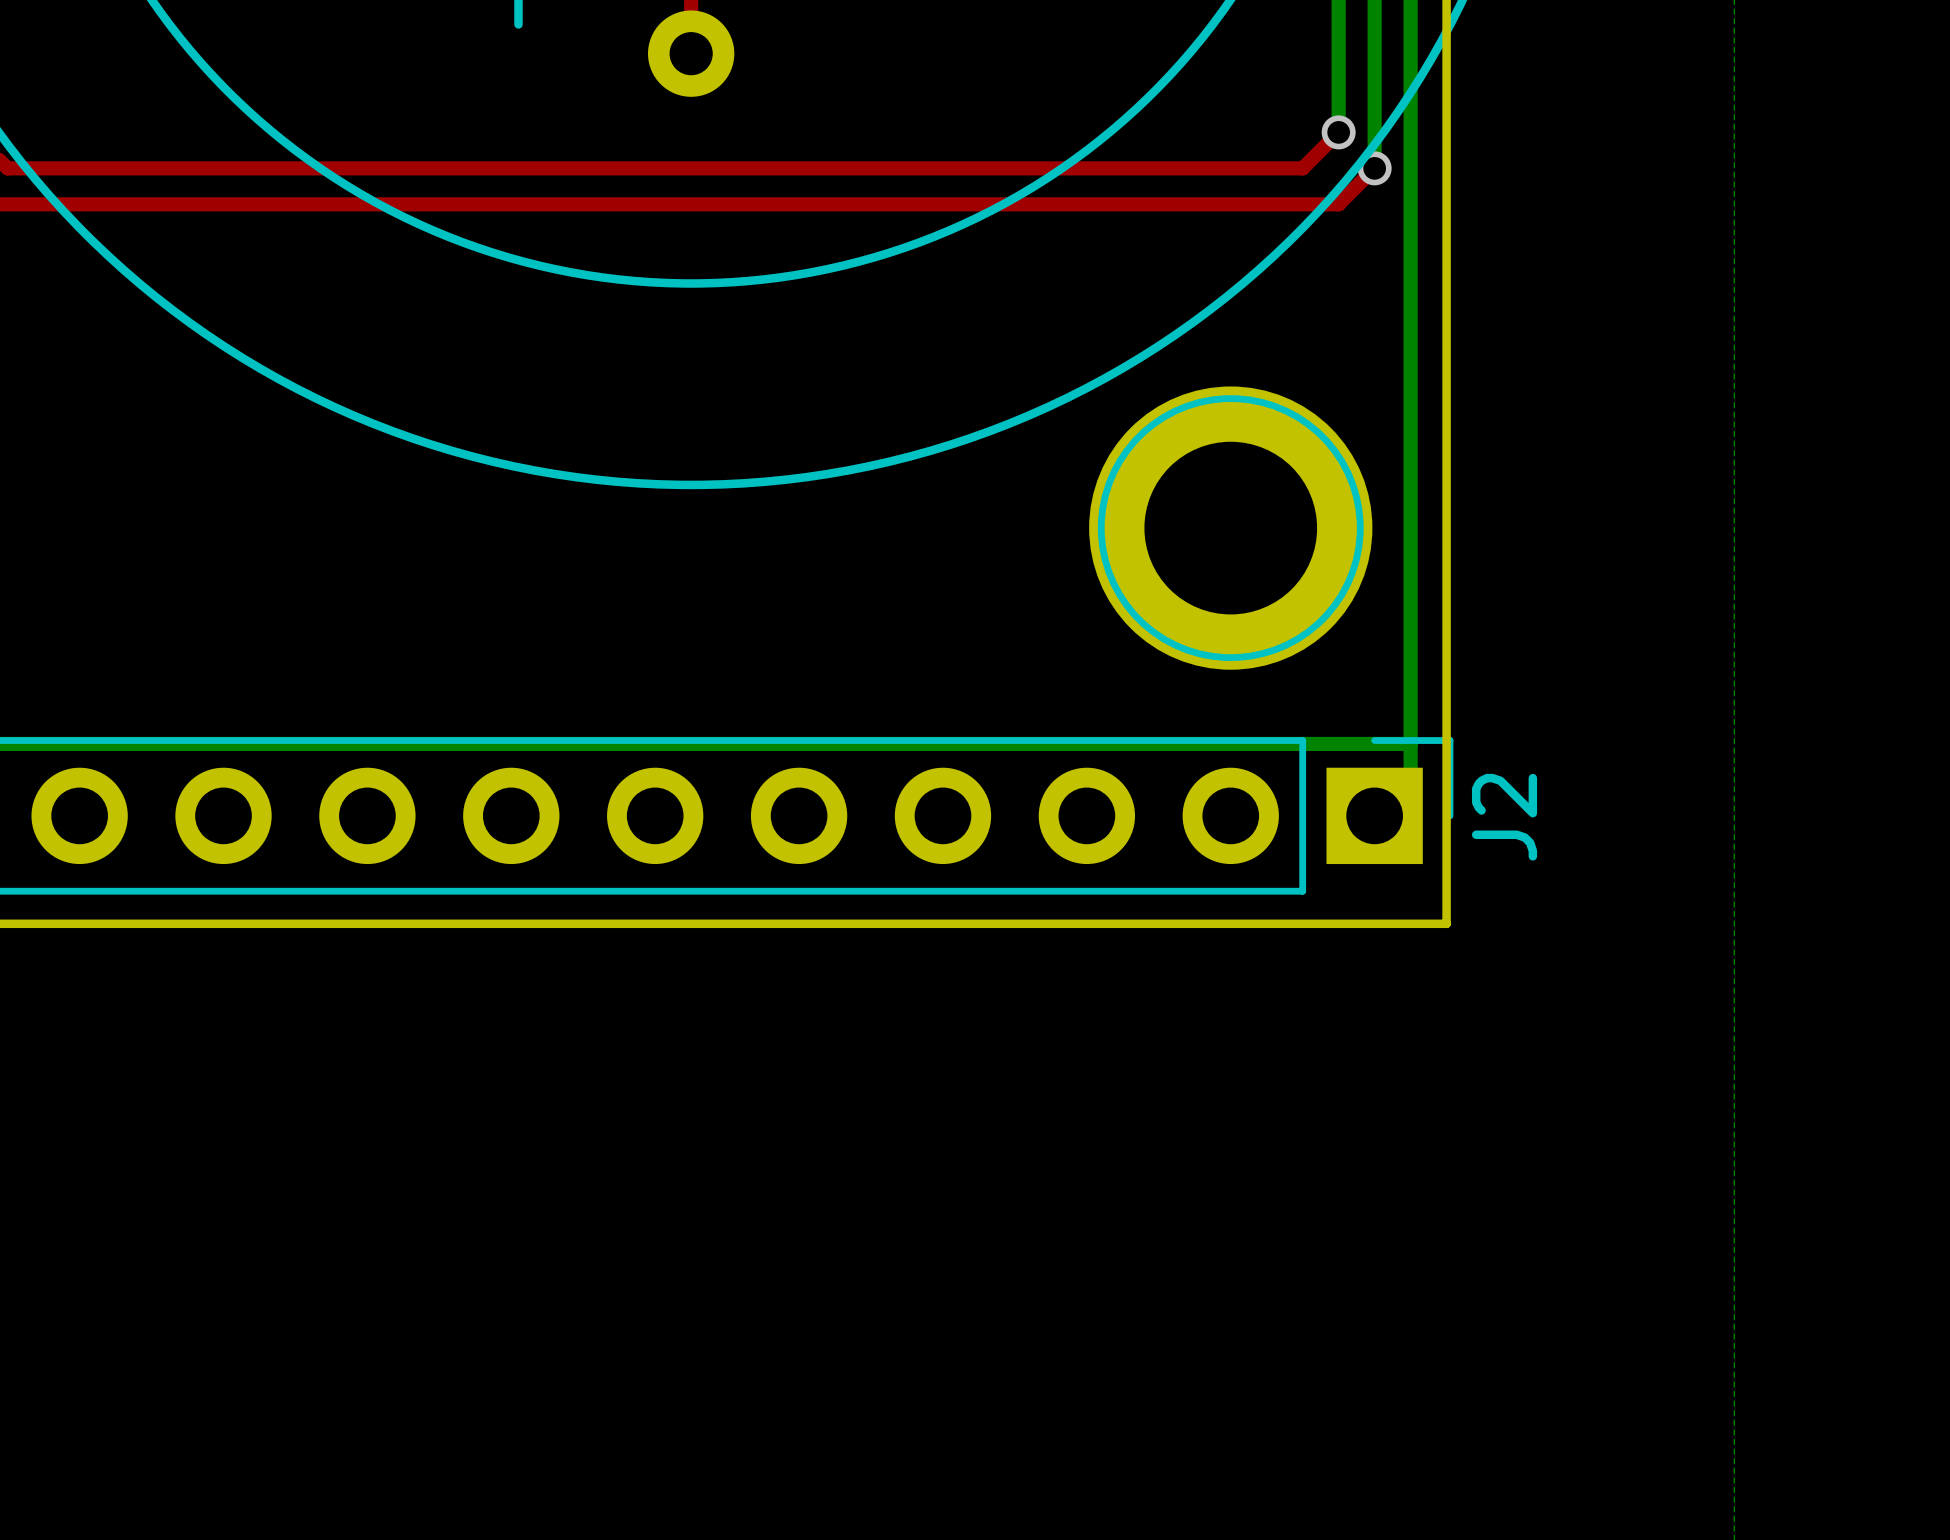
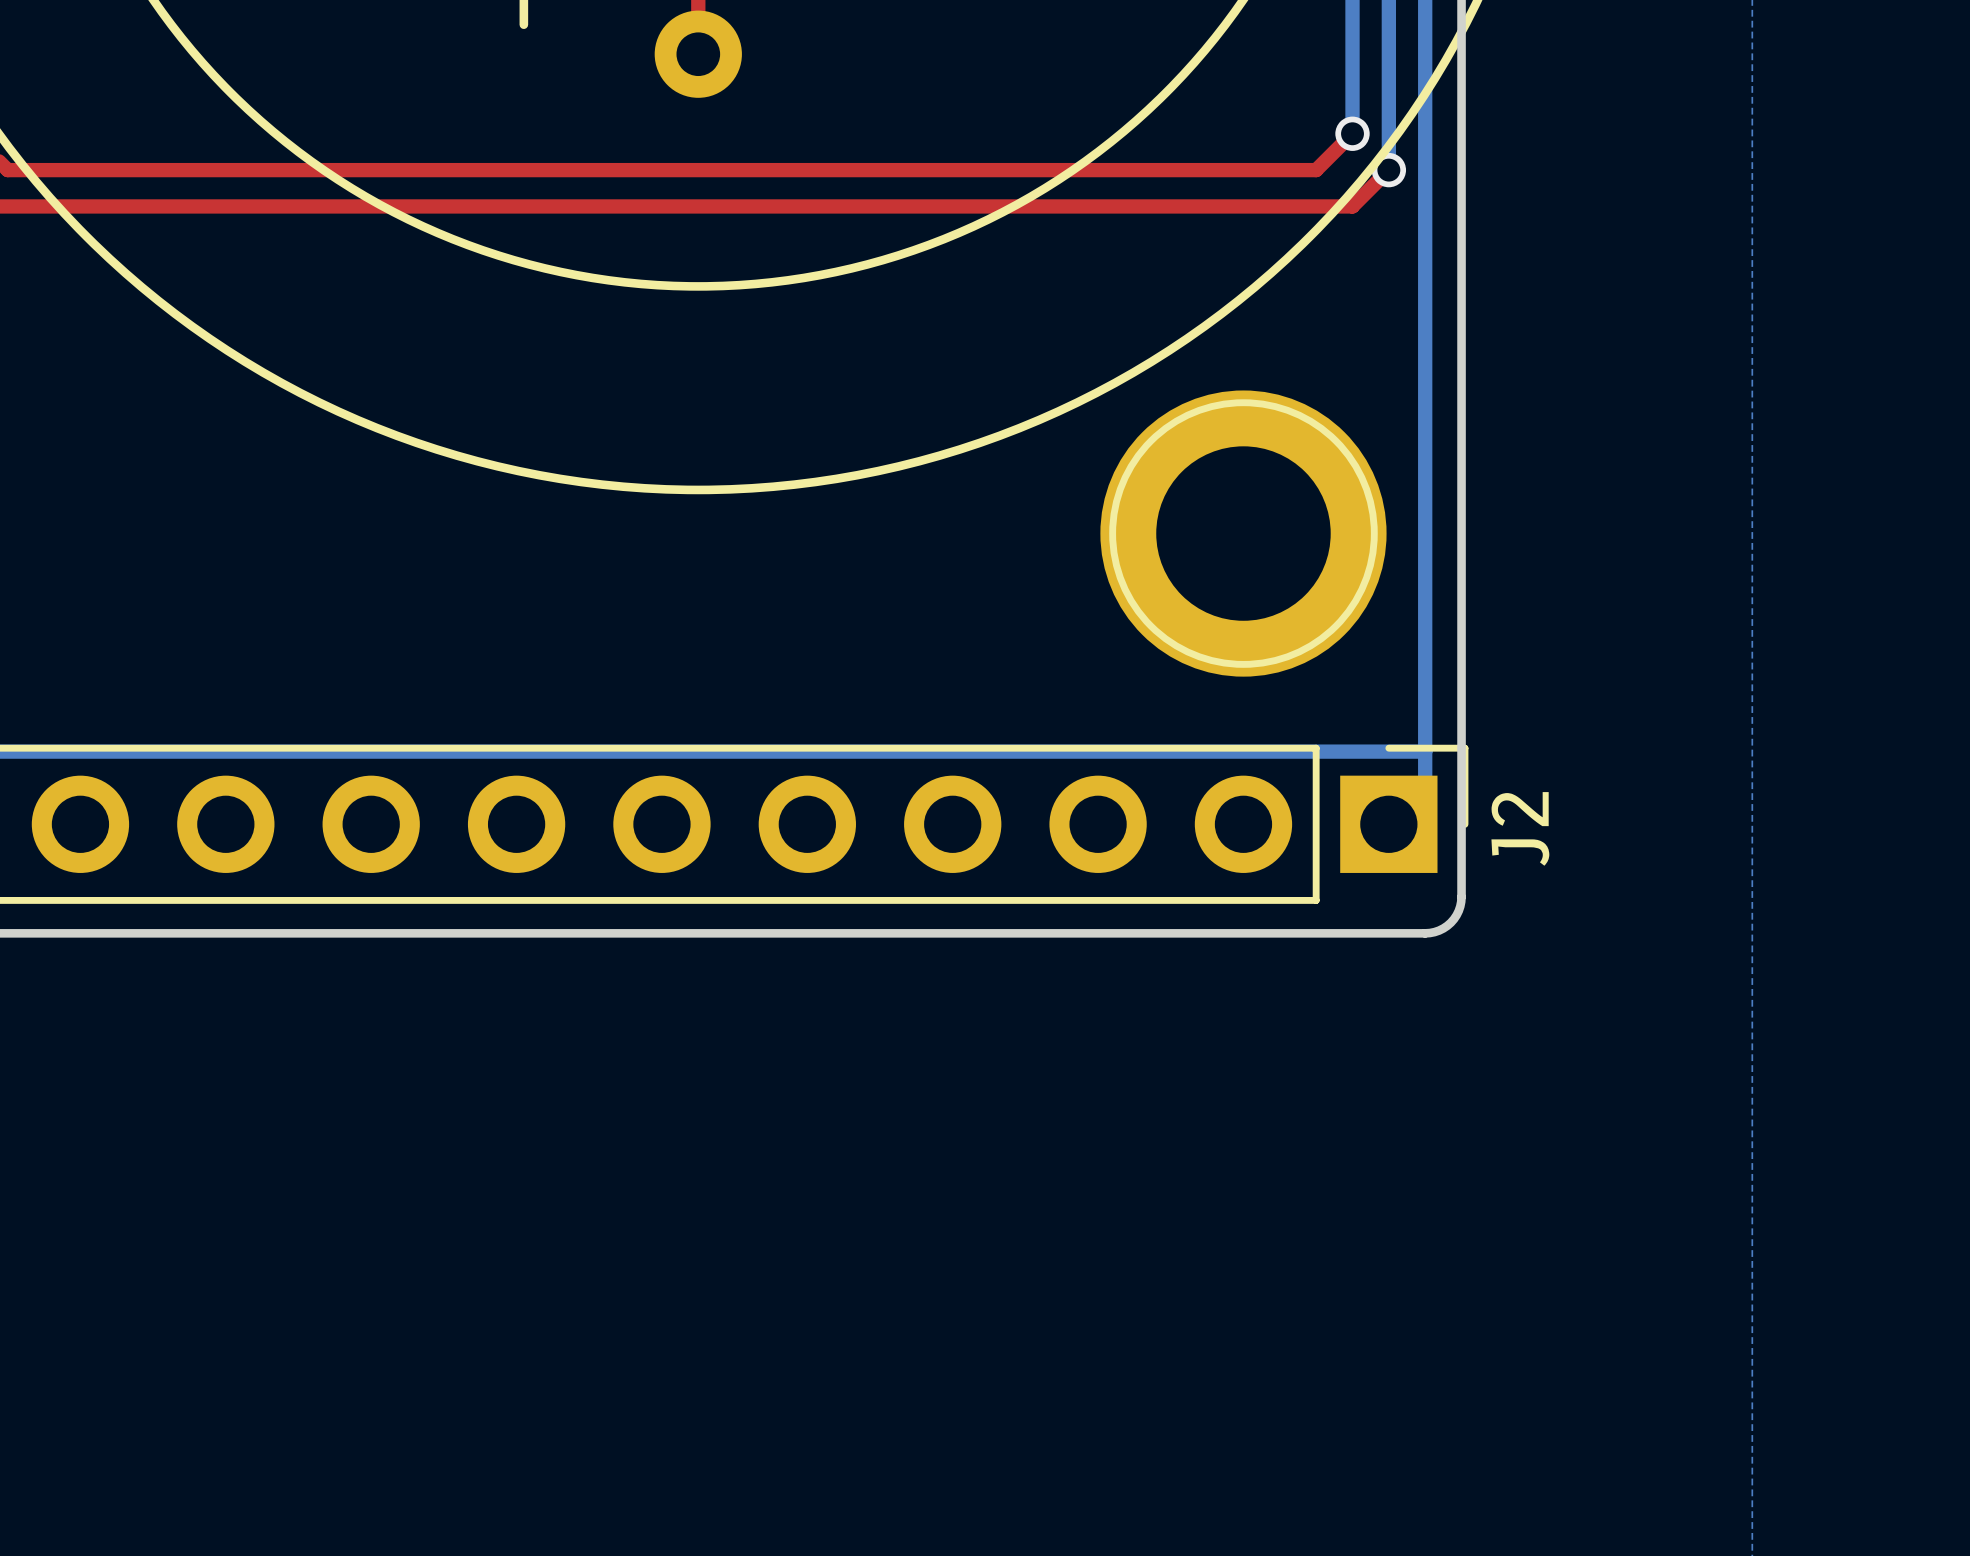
board edge: (1446, 887) (1446, 923) (1410, 923) -> (1461, 897) (1458, 910) (1450, 922) (1439, 930) (1425, 933)

